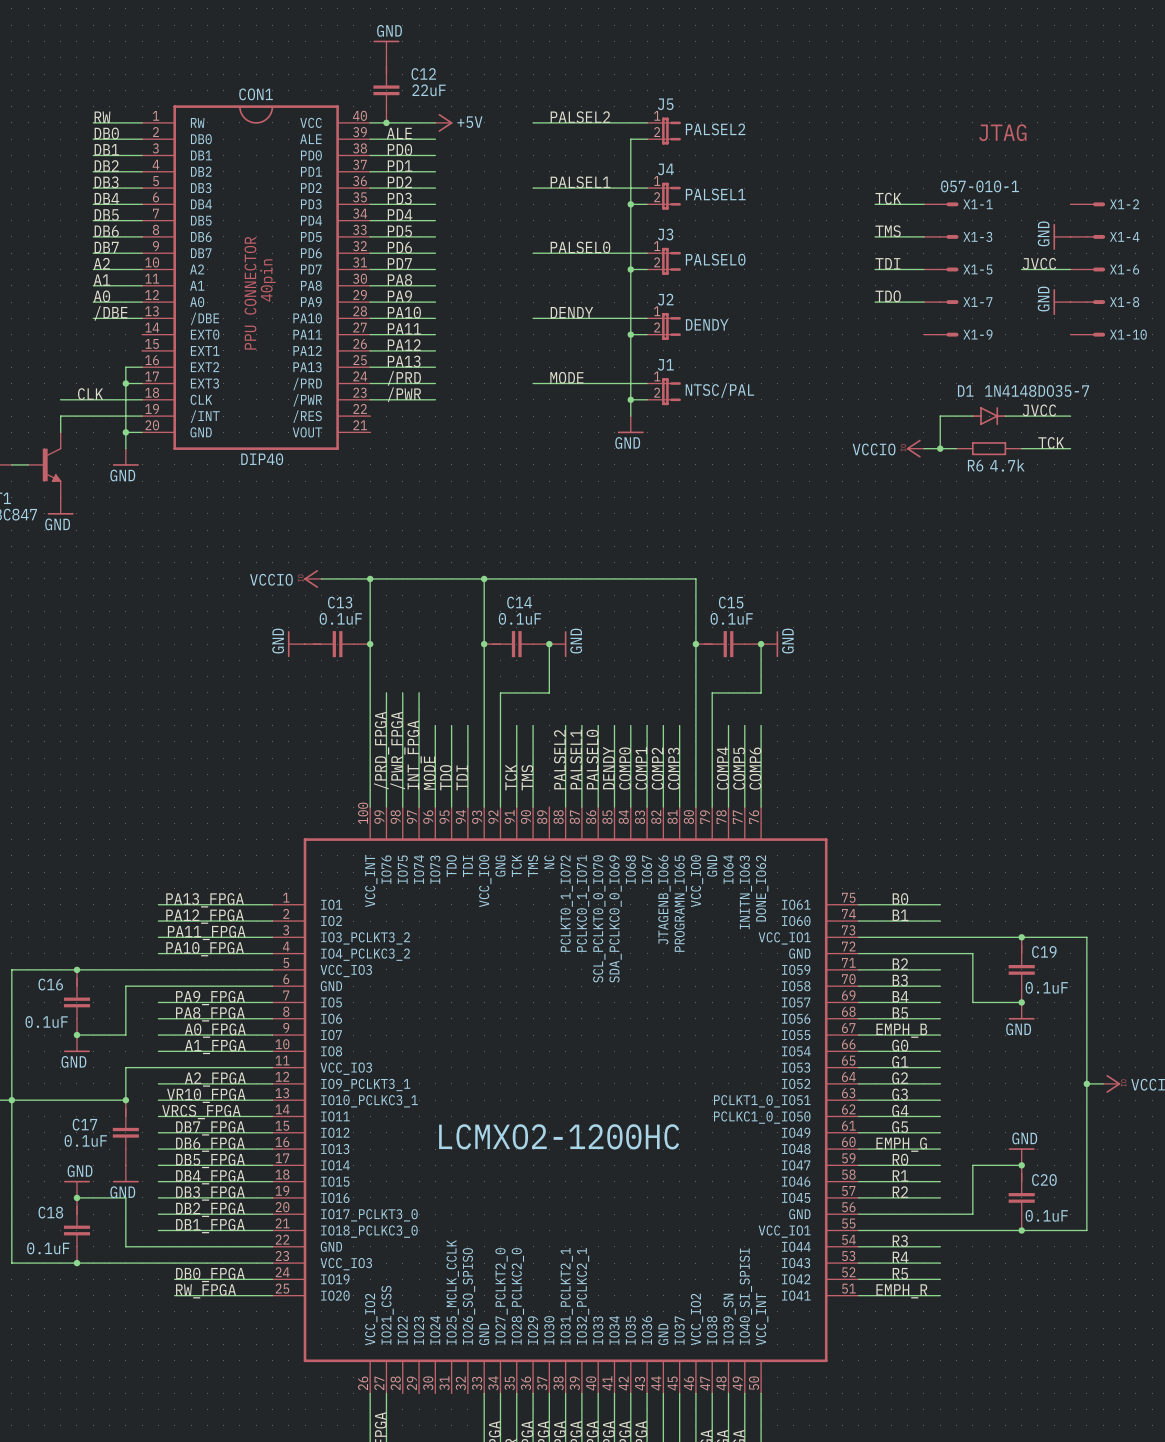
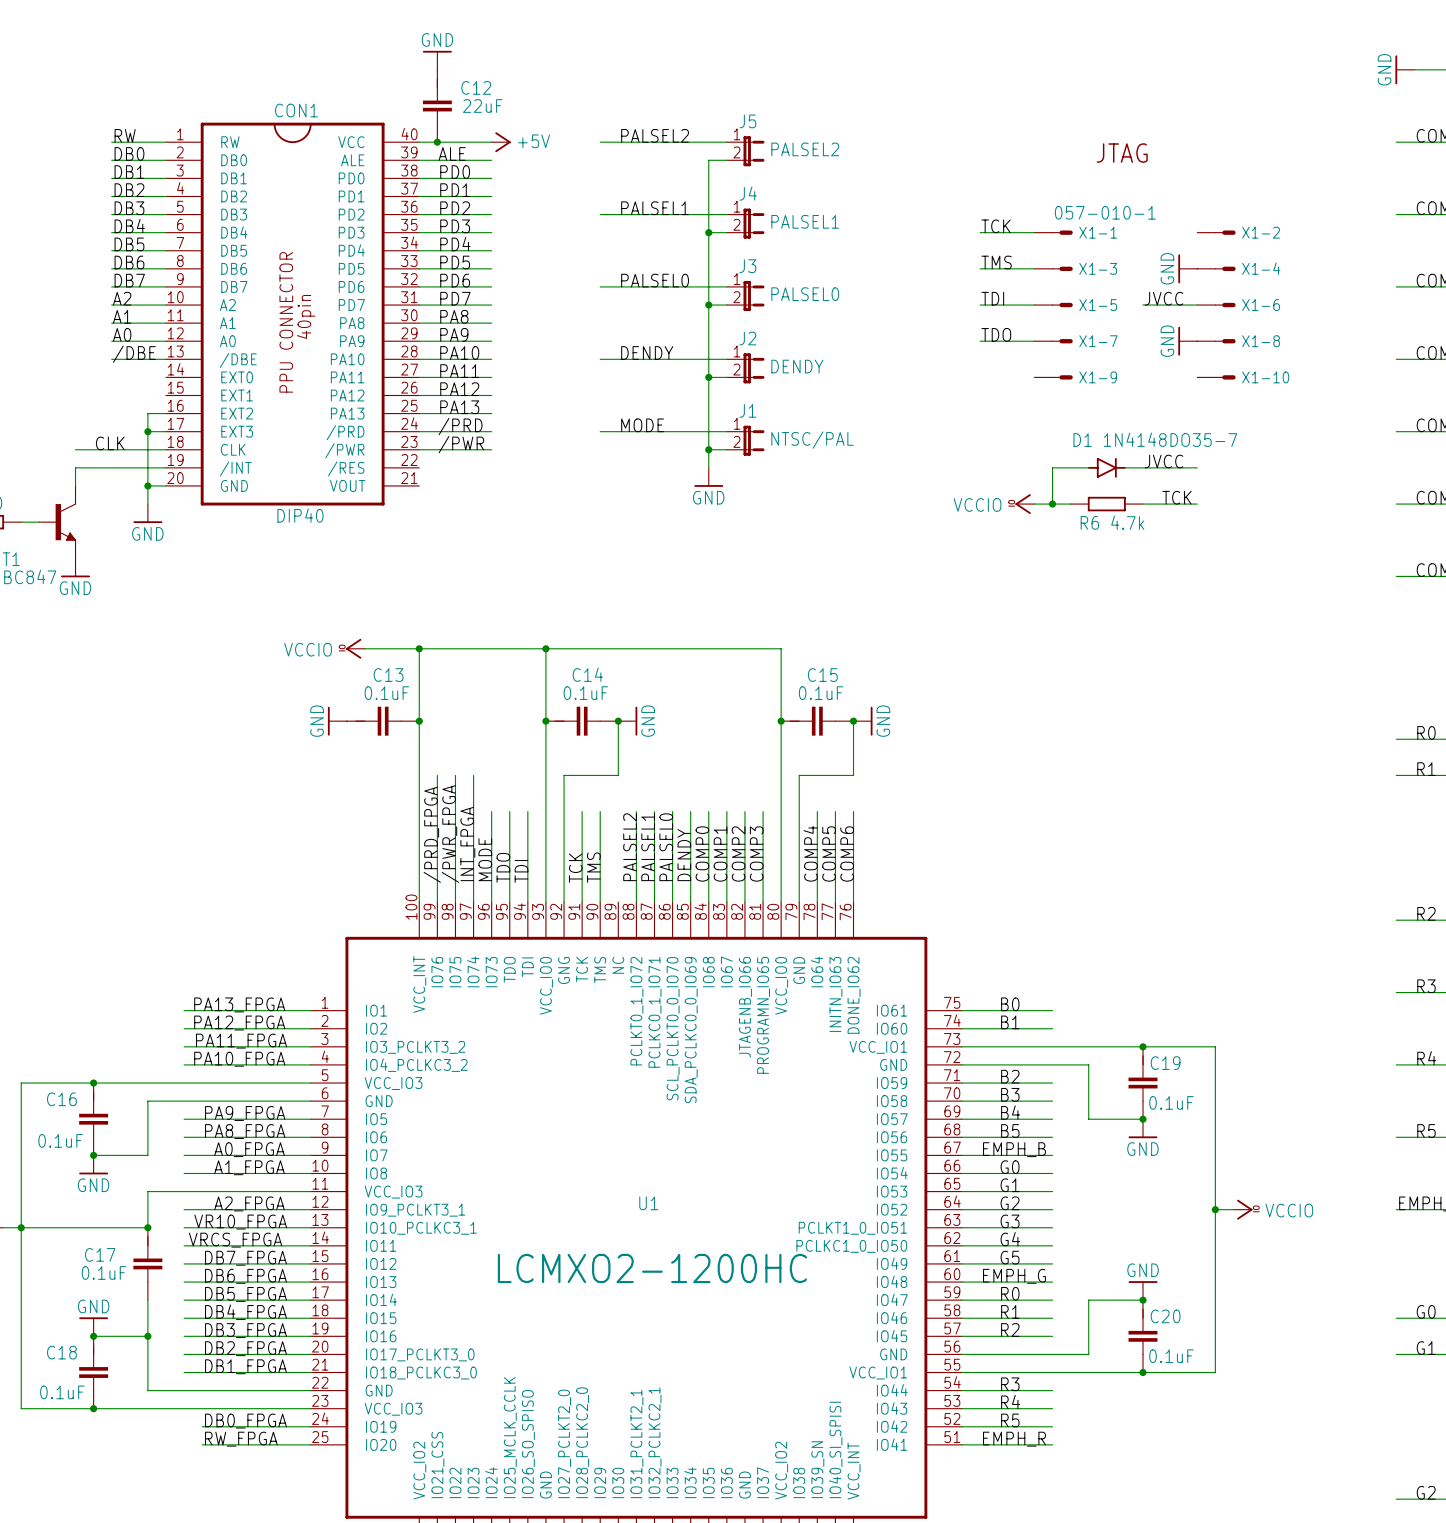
U1 name: none -> U1 (648, 1203)
power symbol: GND (125, 1173) -> none
junction: none -> (147, 1336)

